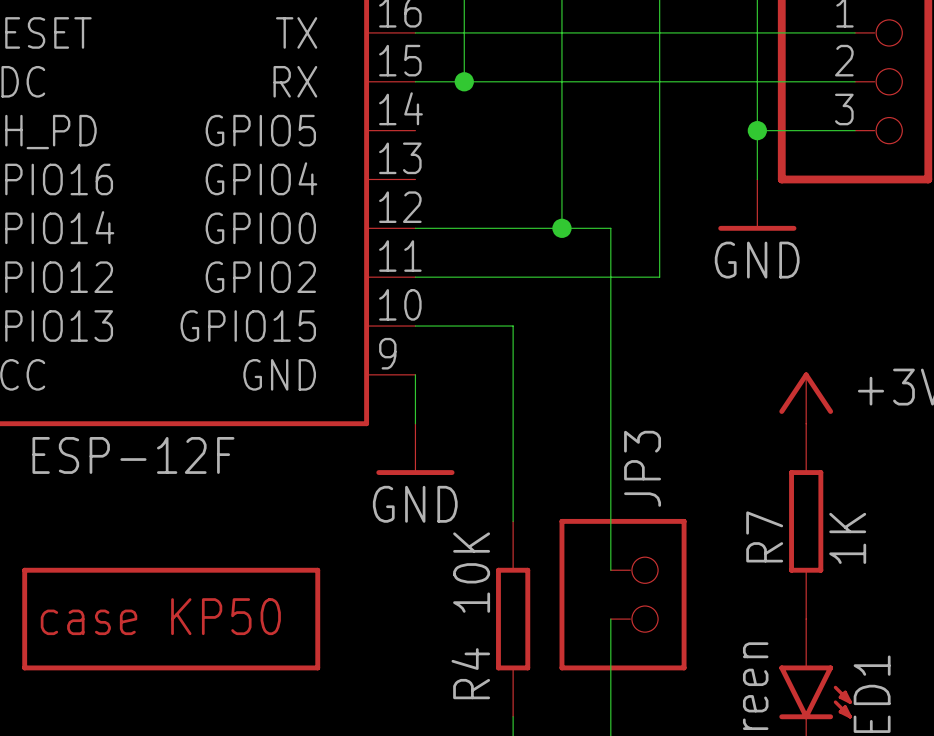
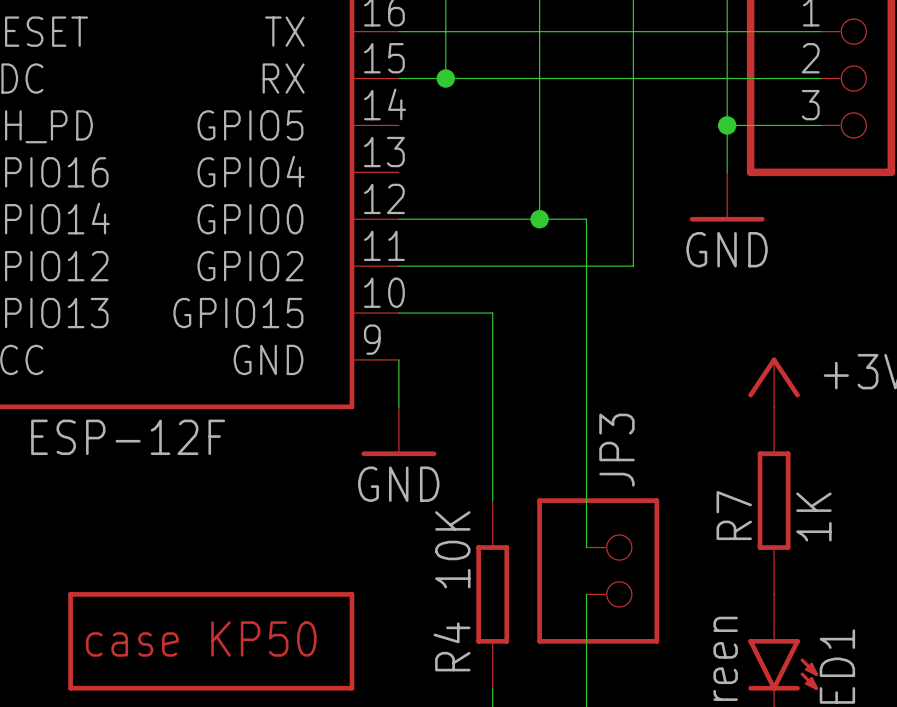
part position: (171, 619) -> (211, 641)

